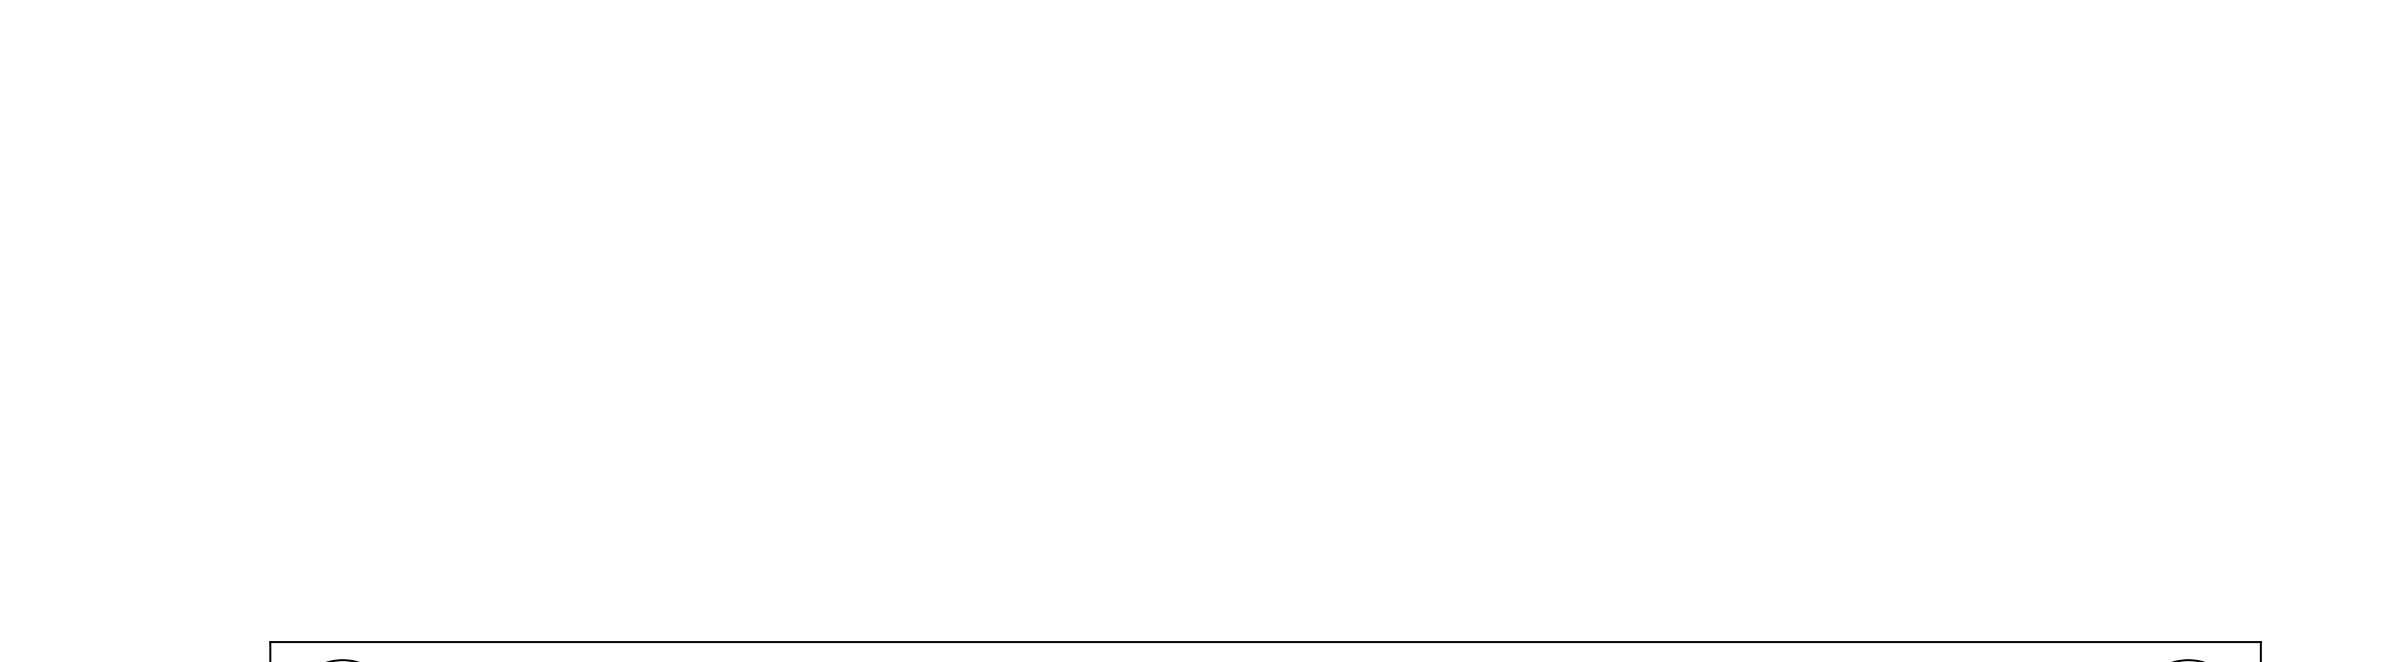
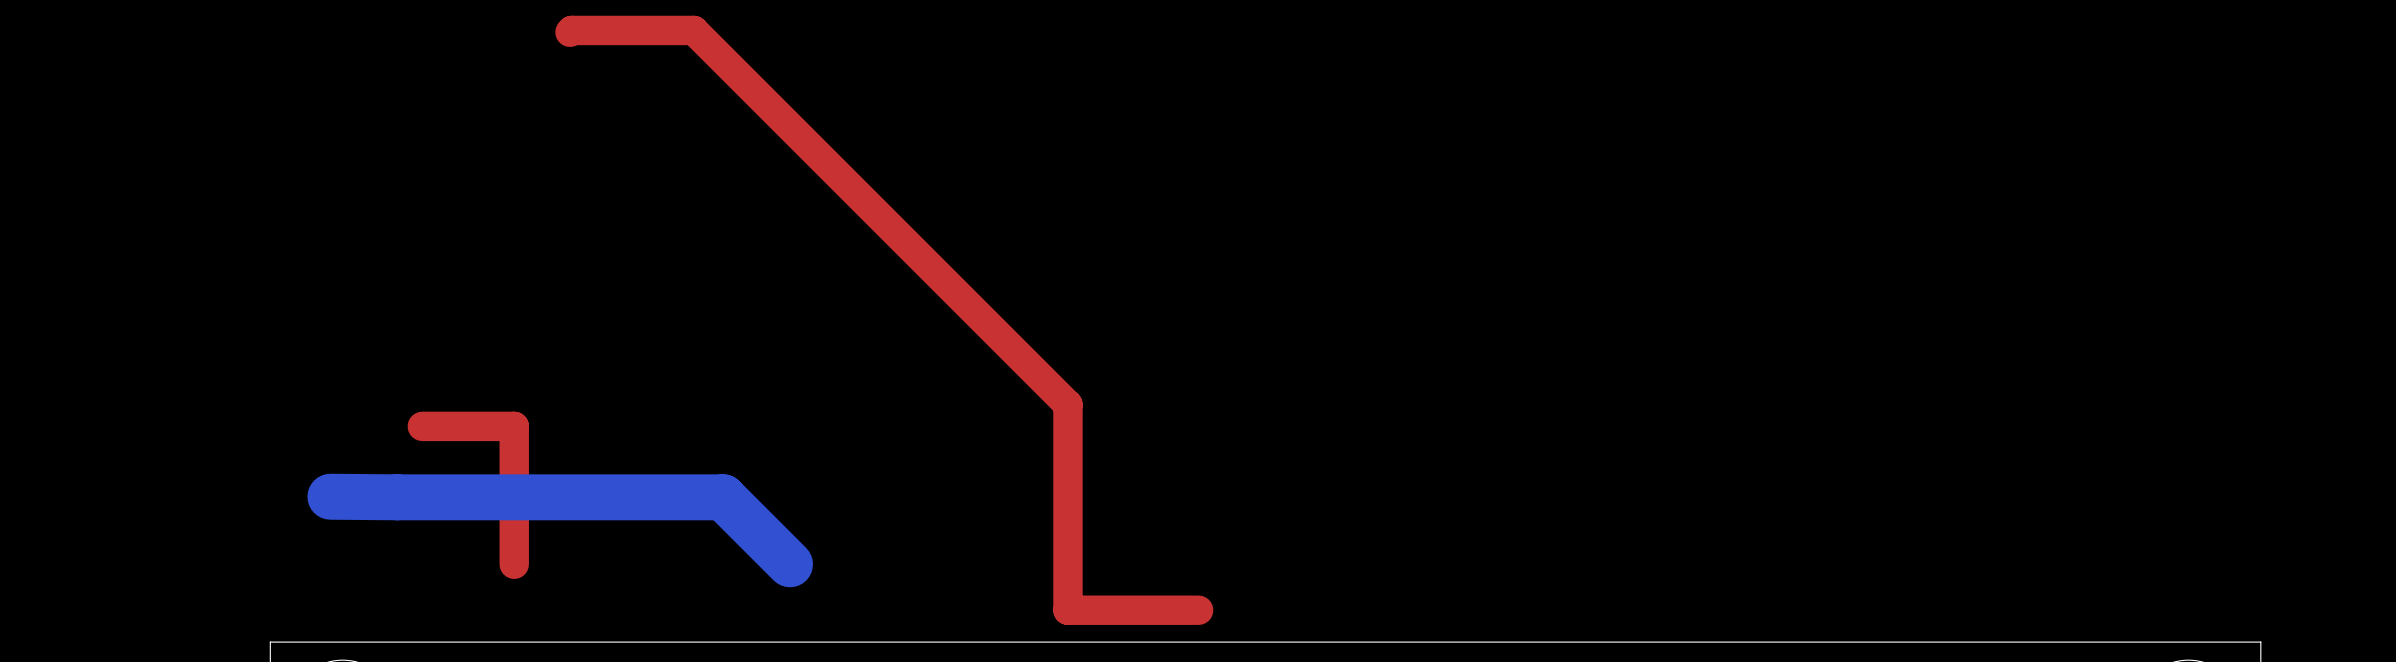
top track: none -> (569, 32) (571, 30) (693, 30) (1067, 404) (1067, 610) (1198, 610)
top track: none -> (422, 426) (514, 426) (514, 564)
bottom track: none -> (330, 496) (723, 497) (790, 564)

